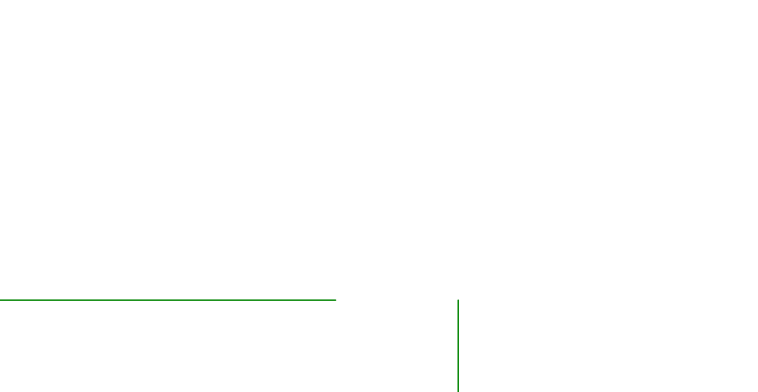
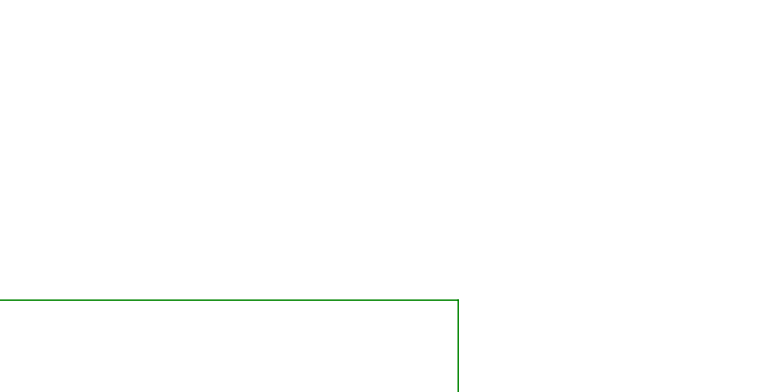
wire: none -> (335, 300) (458, 300)

